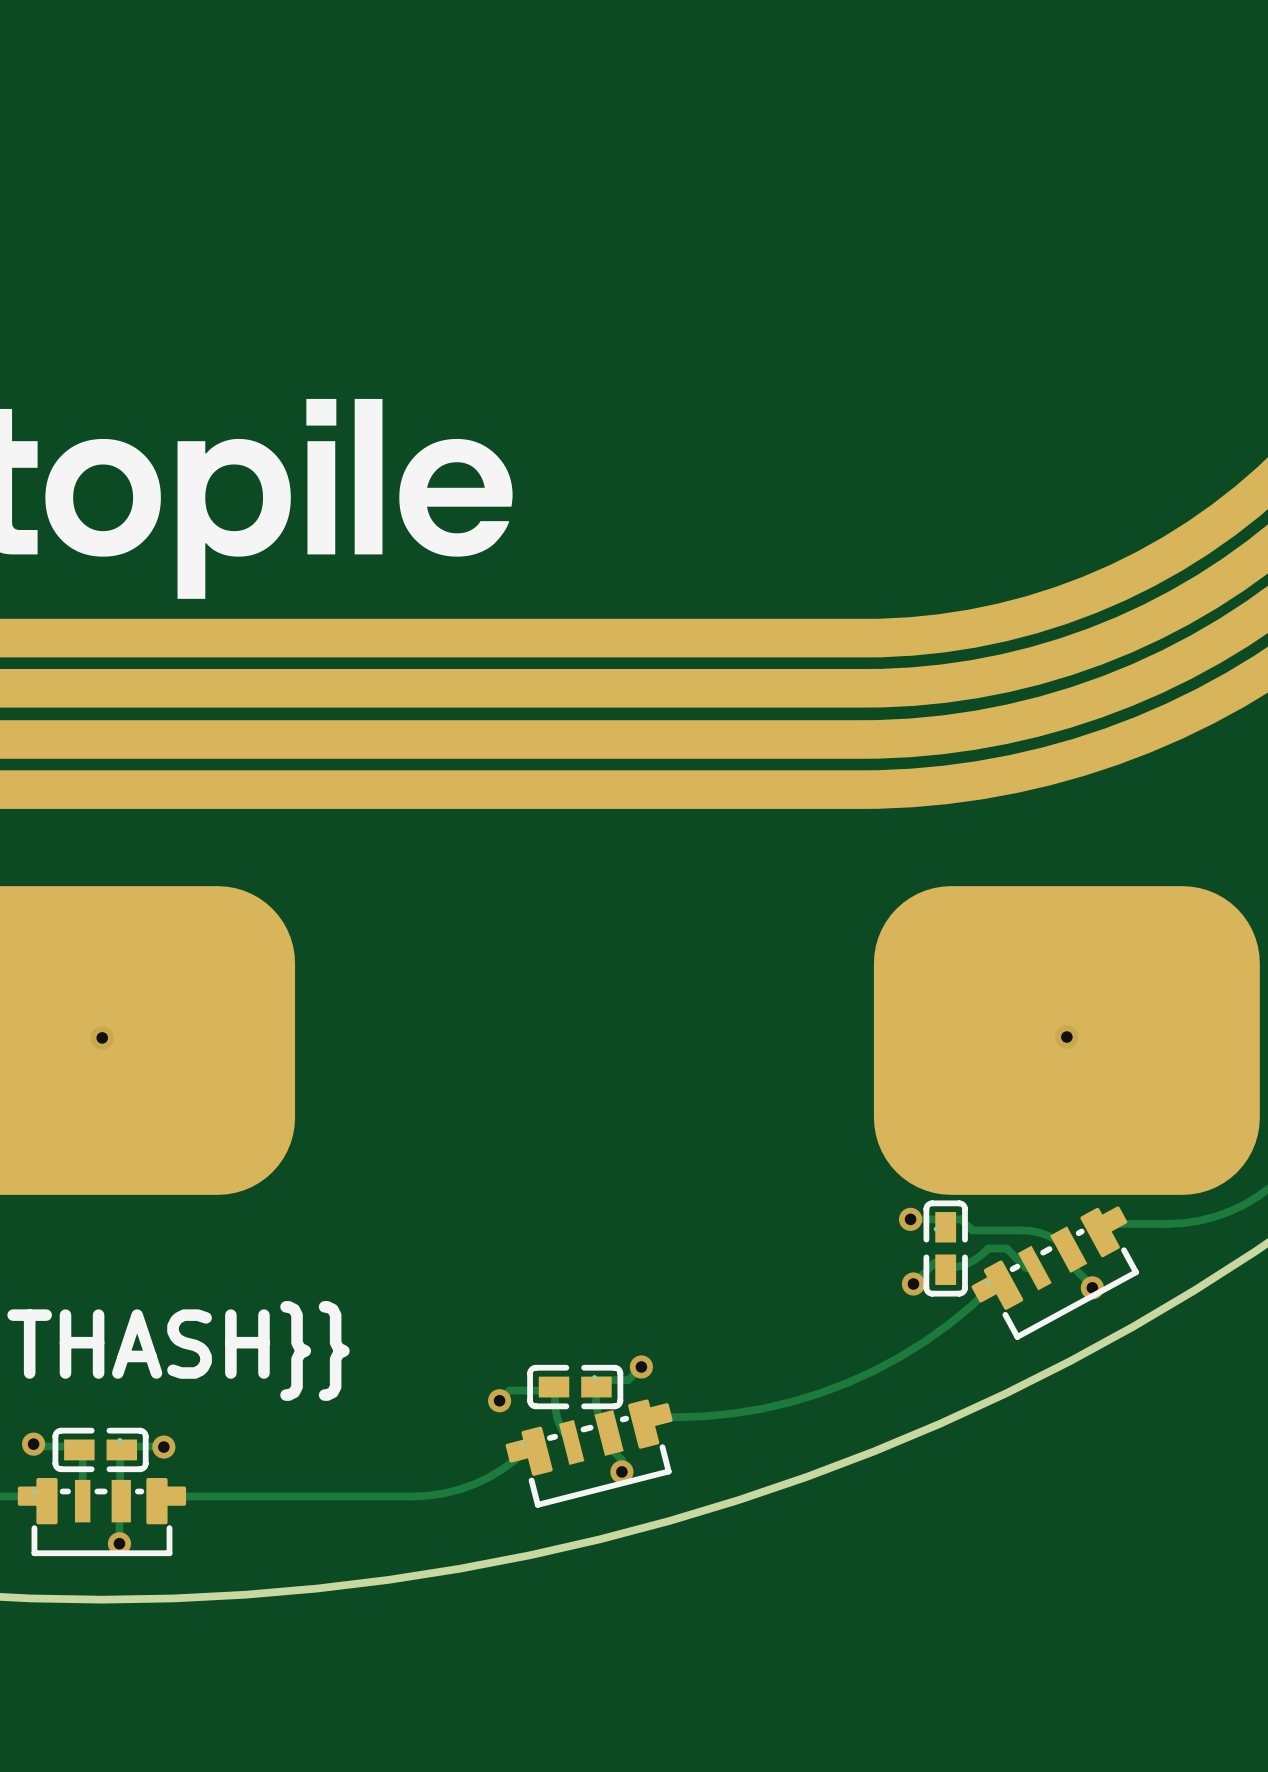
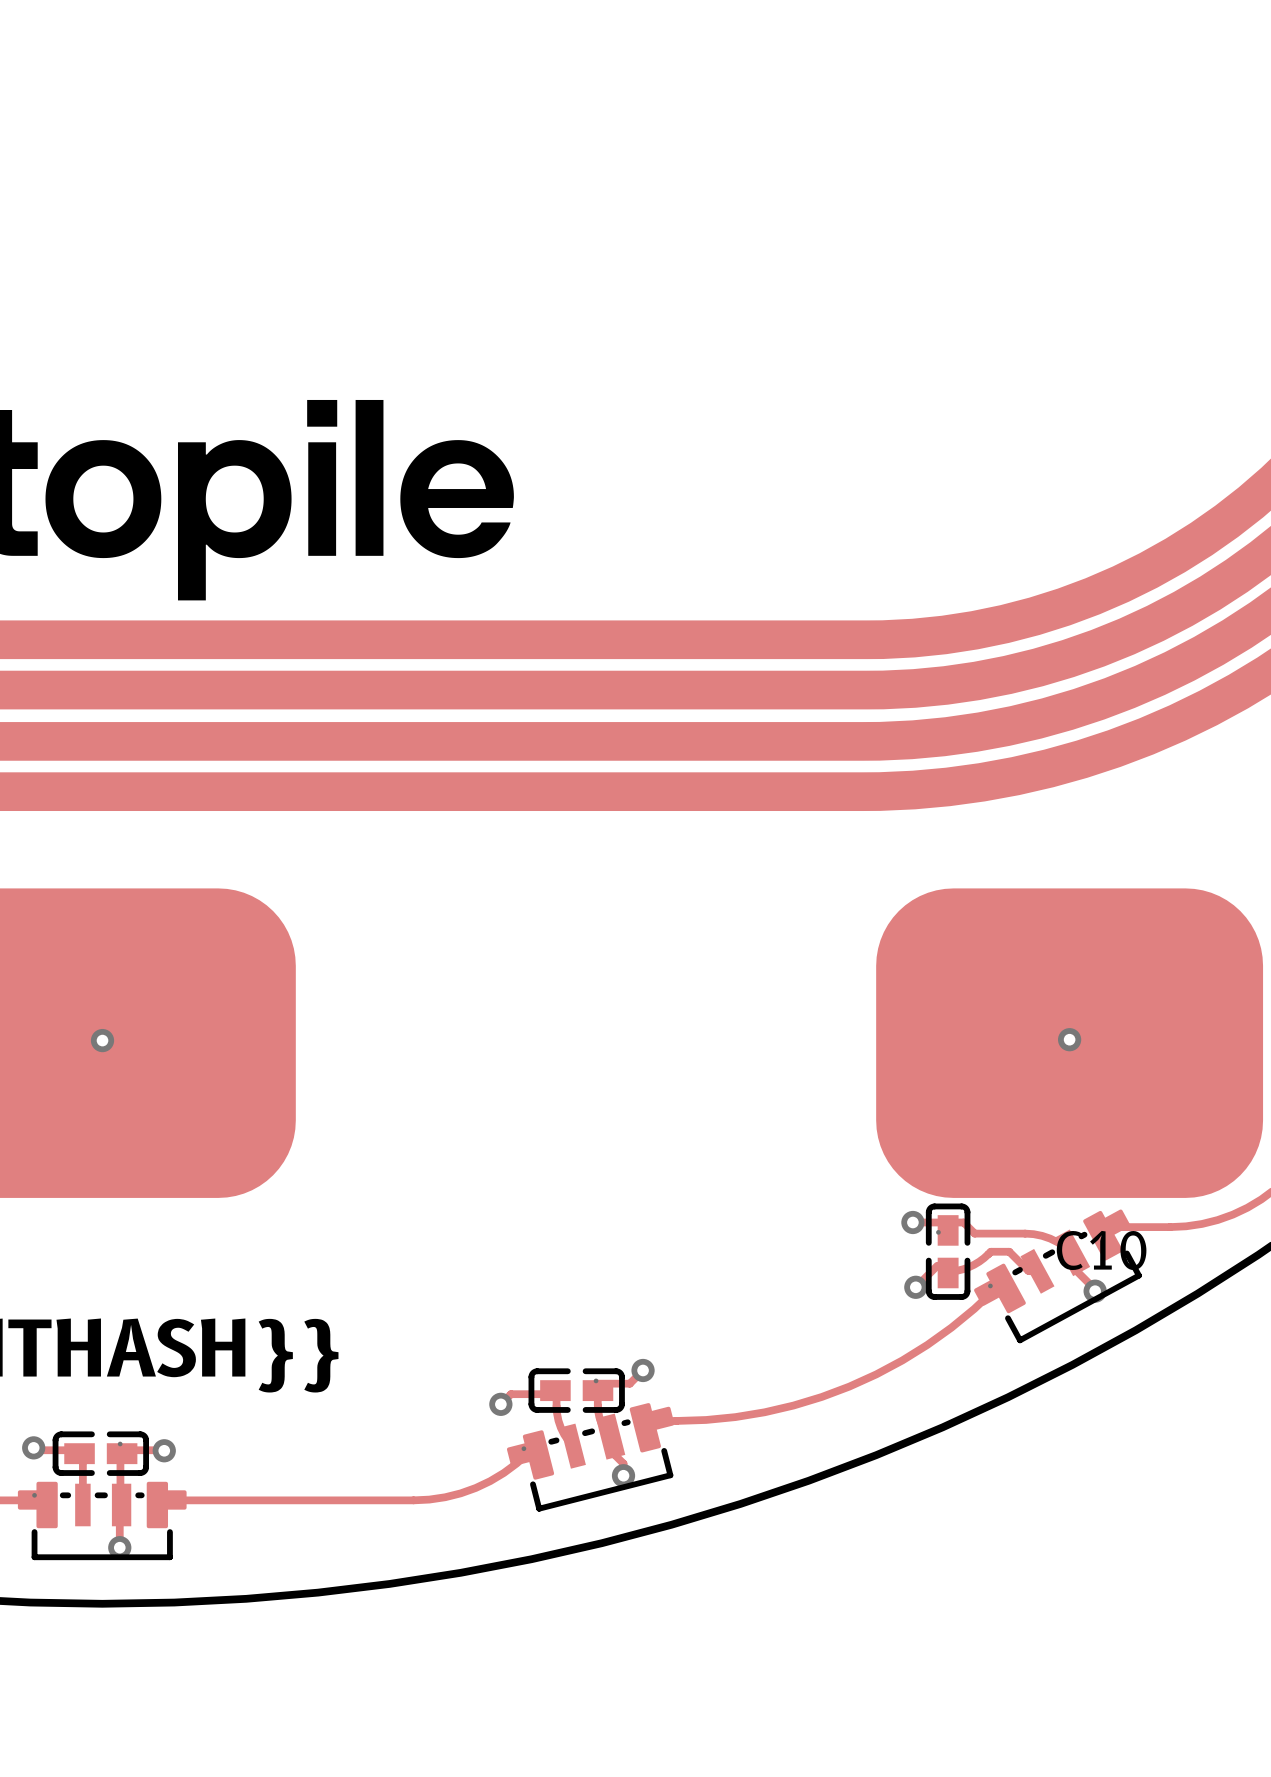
C10 name: none -> C10 (1101, 1250)

